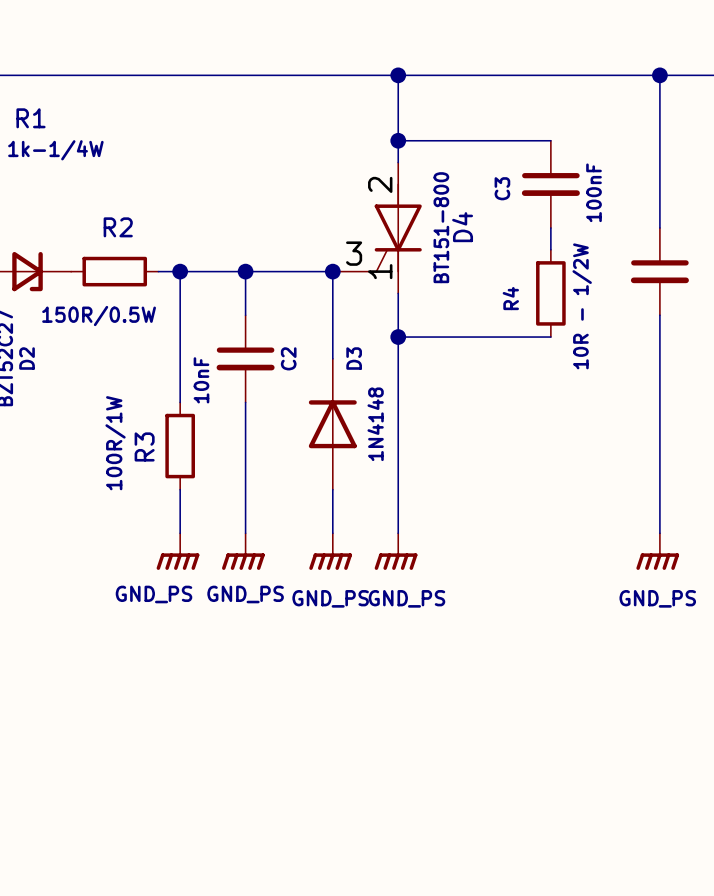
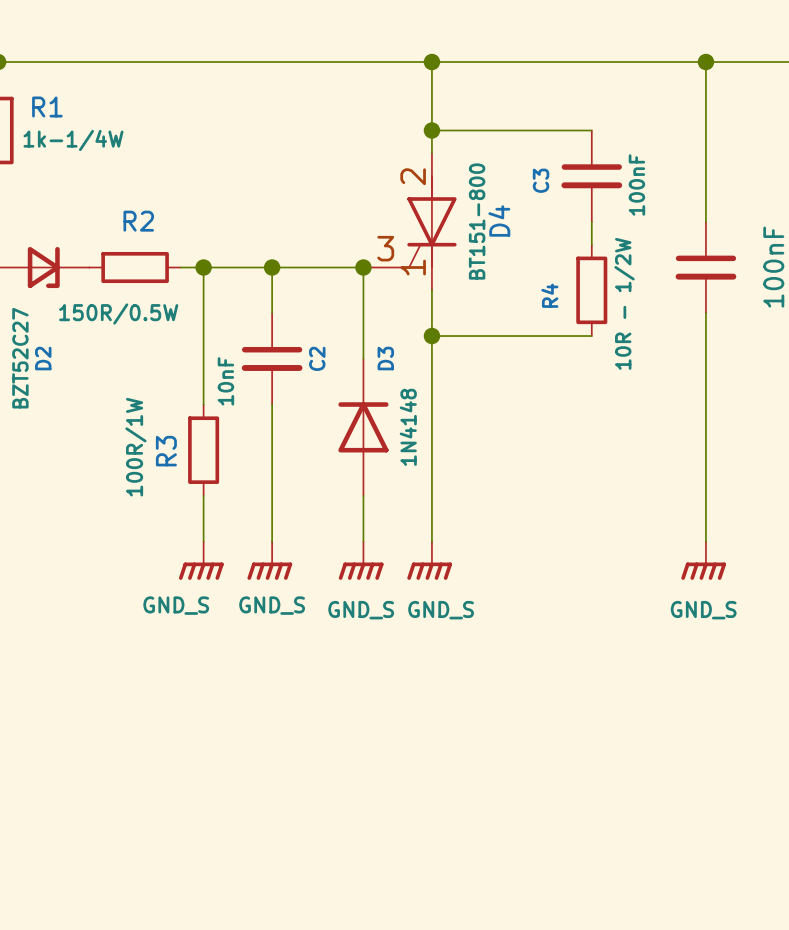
power symbol: GND_PS (177, 551) -> GND_S (201, 560)
power symbol: GND_PS (243, 551) -> GND_S (269, 560)
power symbol: GND_PS (330, 551) -> GND_S (361, 560)
power symbol: GND_PS (396, 551) -> GND_S (429, 560)
power symbol: GND_PS (657, 551) -> GND_S (703, 560)

